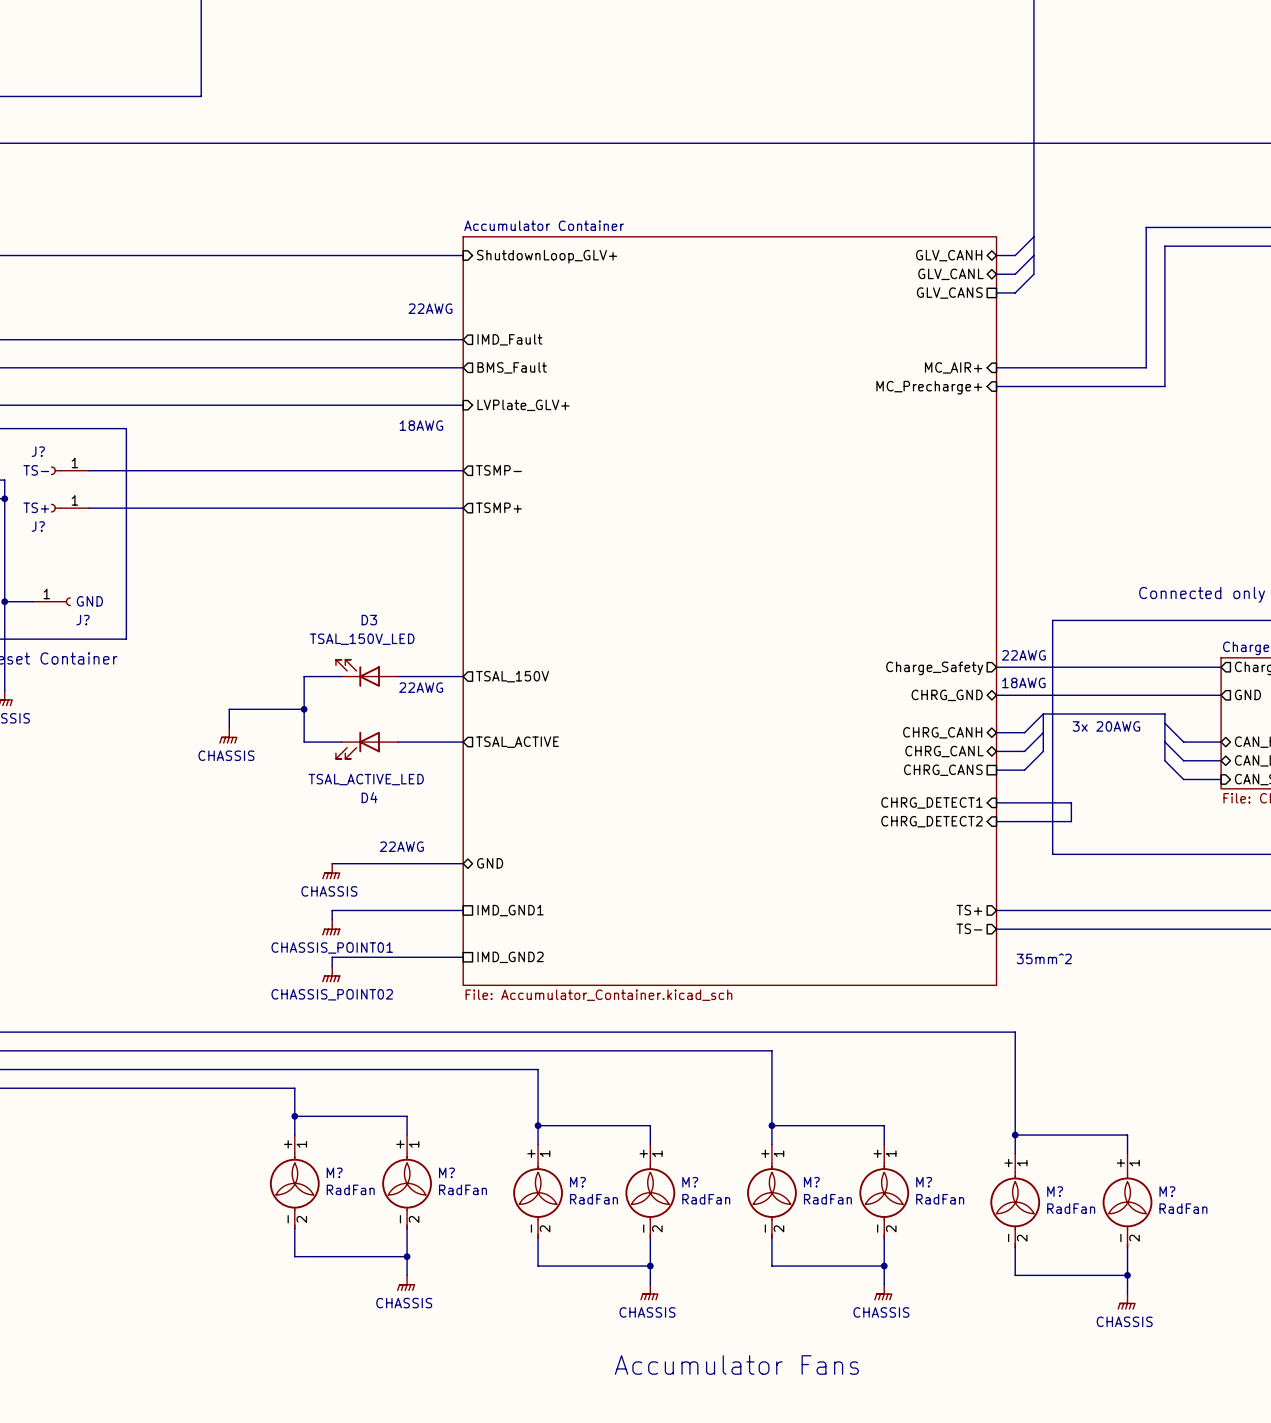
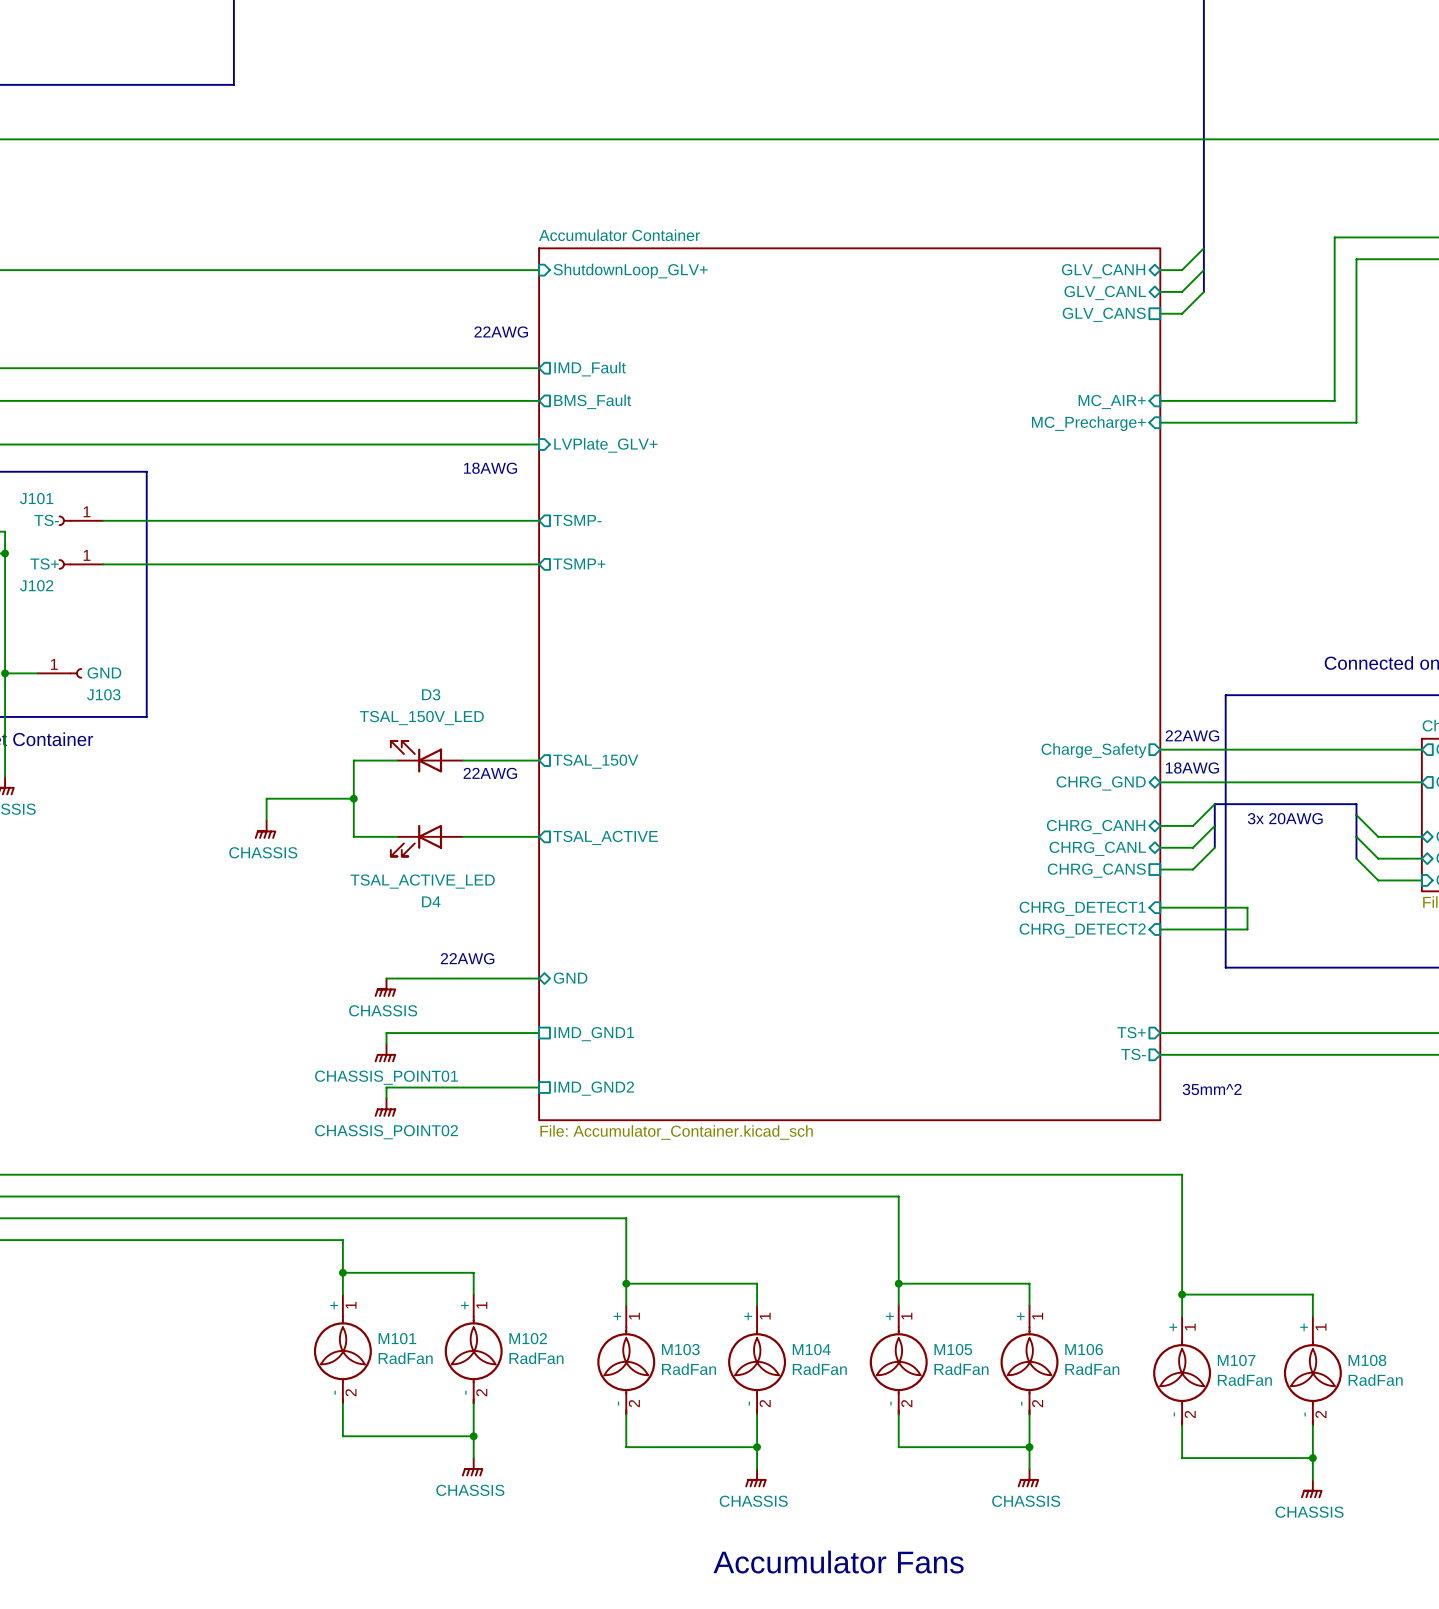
J? name: J? (38, 451) -> J101 (36, 498)
J? name: J? (38, 526) -> J102 (36, 585)
J? name: J? (83, 620) -> J103 (103, 694)
M? name: M? (334, 1172) -> M101 (397, 1338)
M? name: M? (446, 1172) -> M102 (528, 1338)
M? name: M? (577, 1182) -> M103 (680, 1349)
M? name: M? (690, 1182) -> M104 (811, 1349)
M? name: M? (811, 1182) -> M105 (953, 1349)
M? name: M? (924, 1182) -> M106 (1084, 1349)
M? name: M? (1055, 1191) -> M107 (1236, 1360)
M? name: M? (1167, 1191) -> M108 (1367, 1360)

